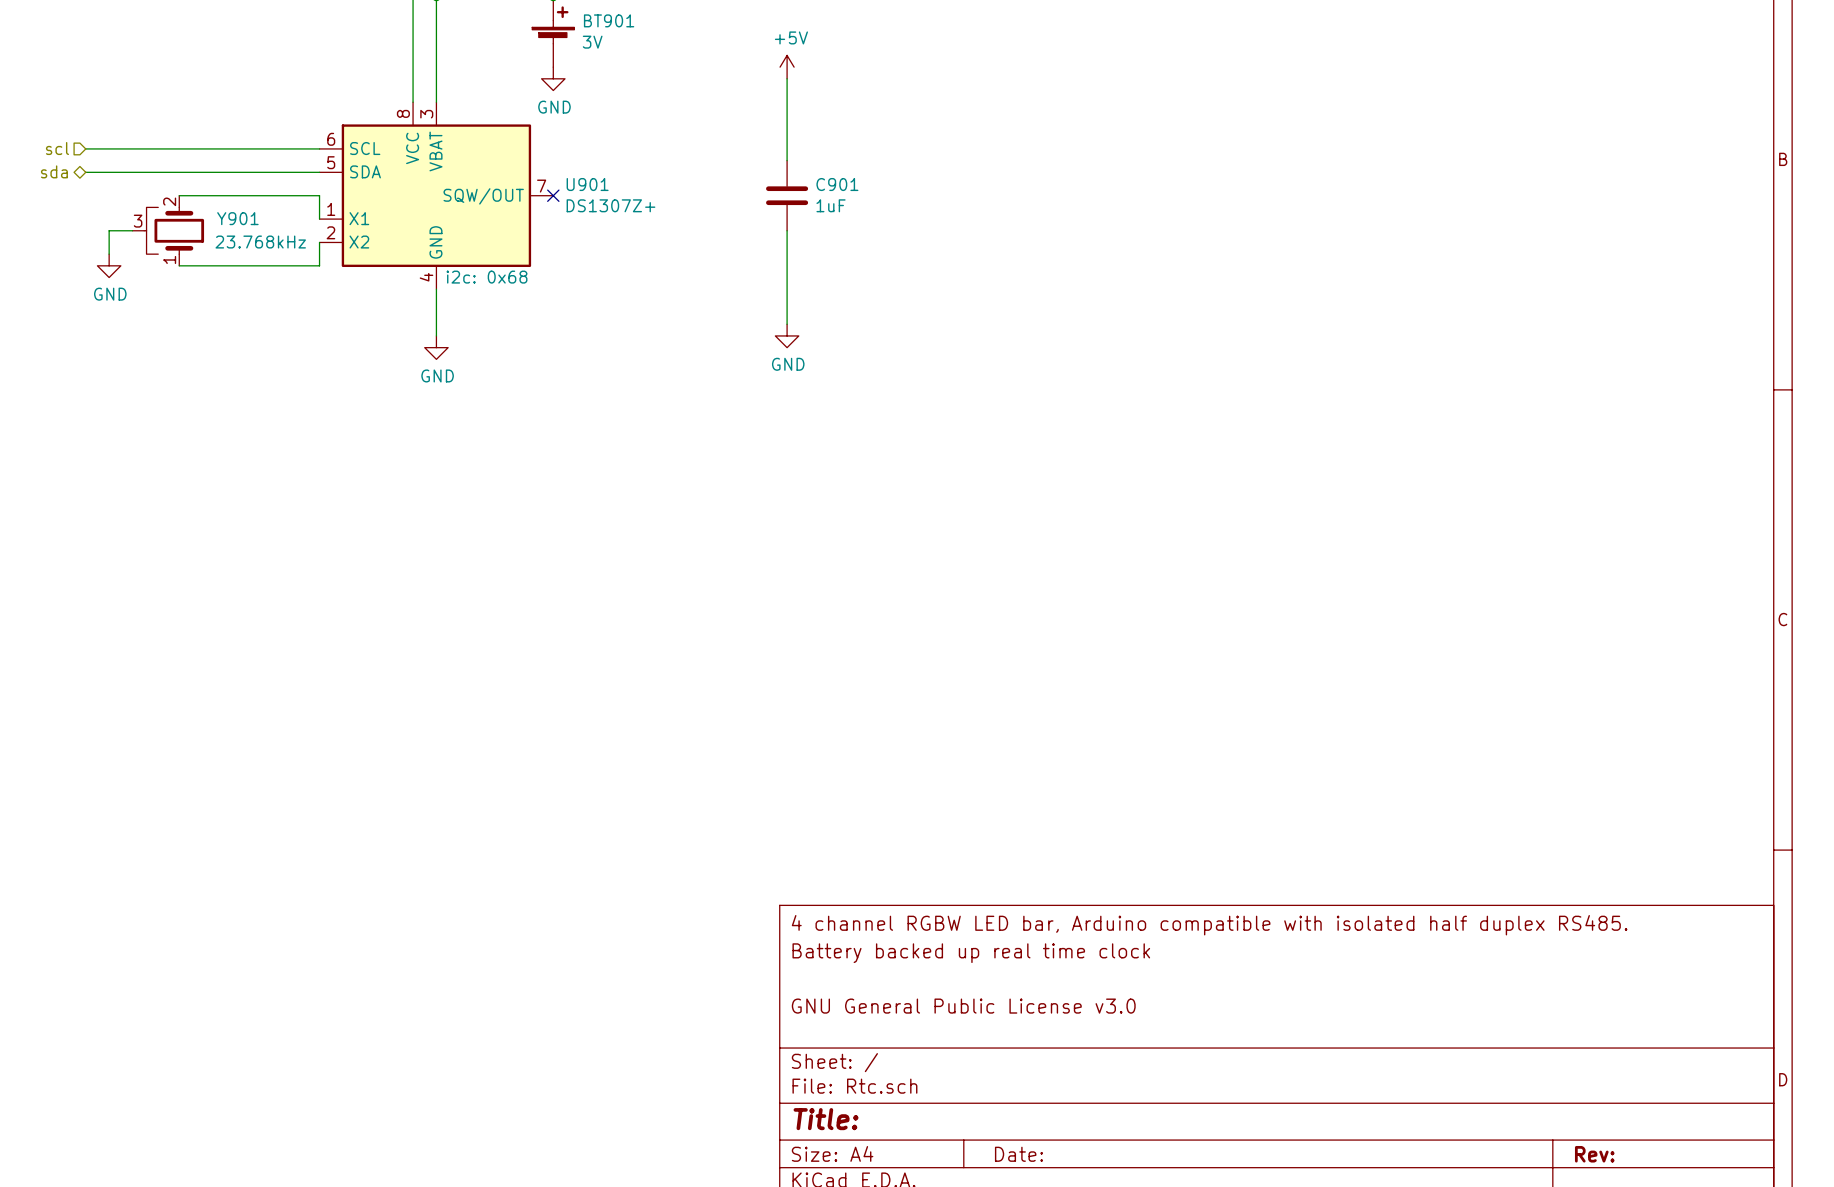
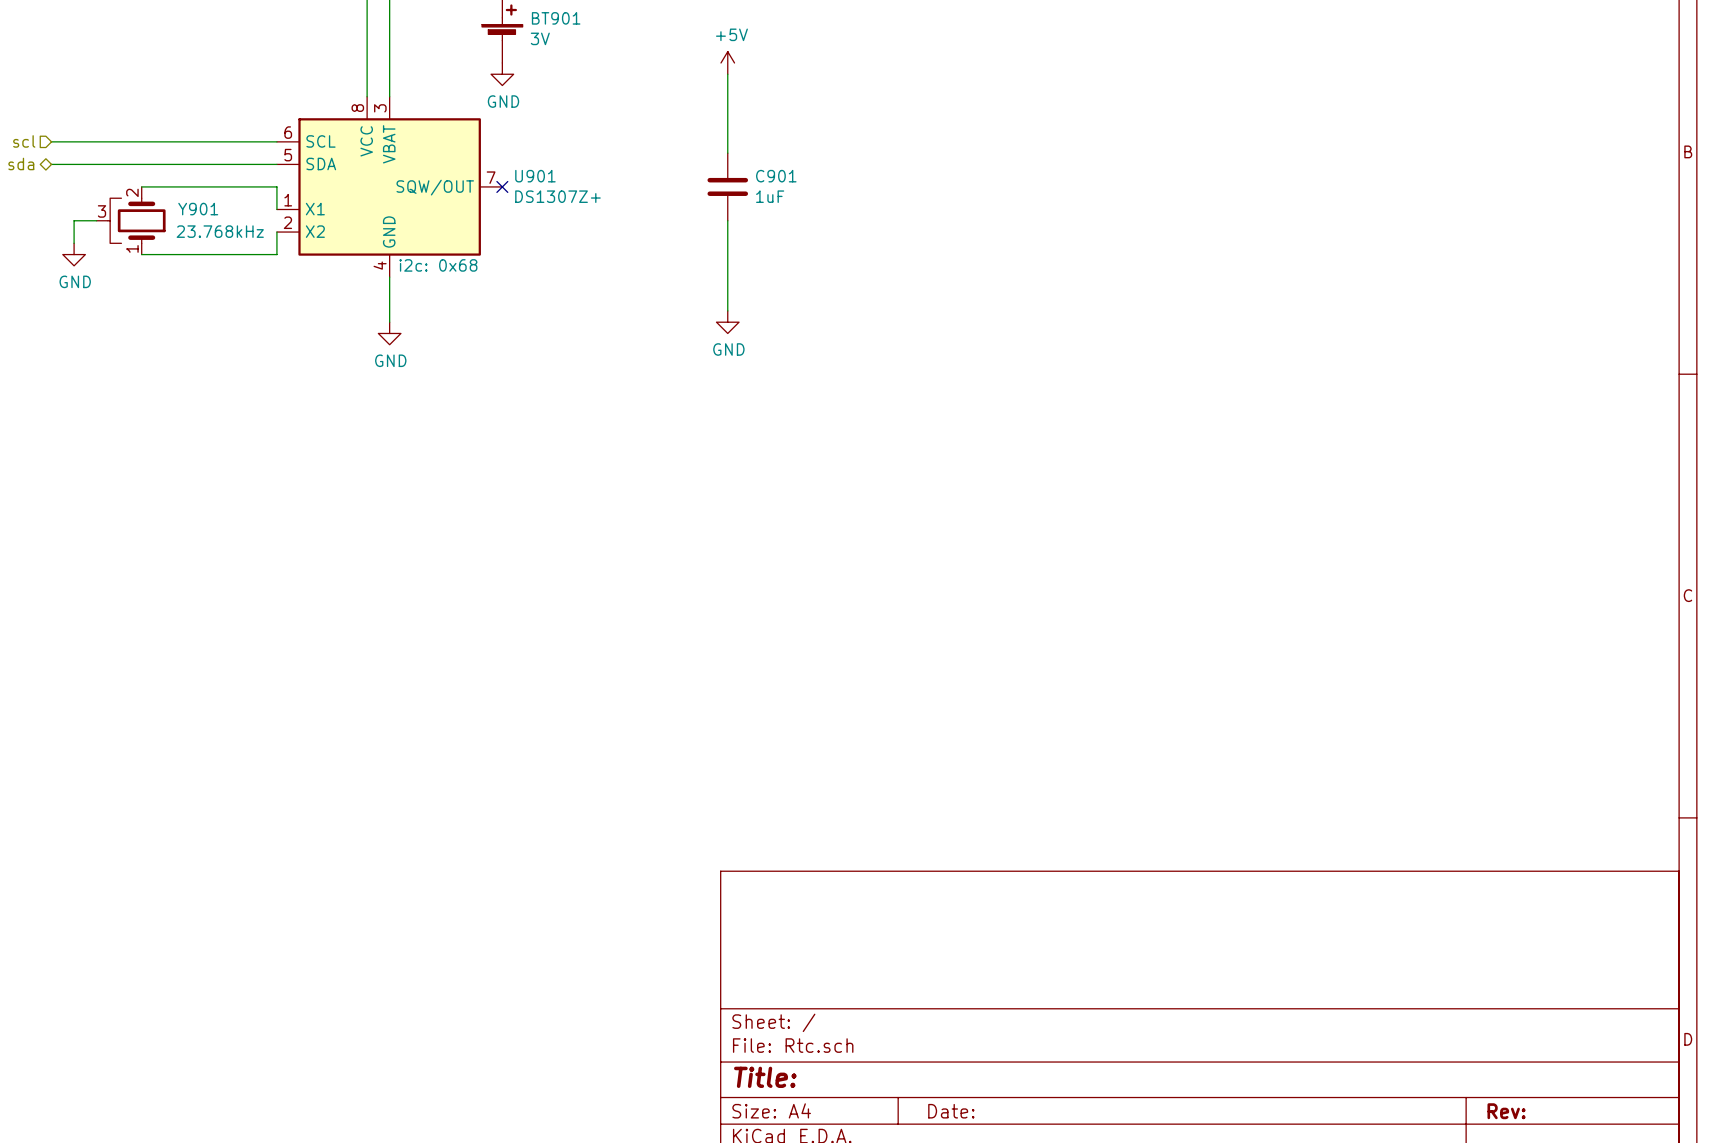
title block: 4 channel RGBW LED bar, Arduino compatible with isolated half duplex RS485. (1209, 925) -> none
title block: Battery backed up real time clock (971, 953) -> none
title block: GNU General Public License v3.0 (963, 1006) -> none

